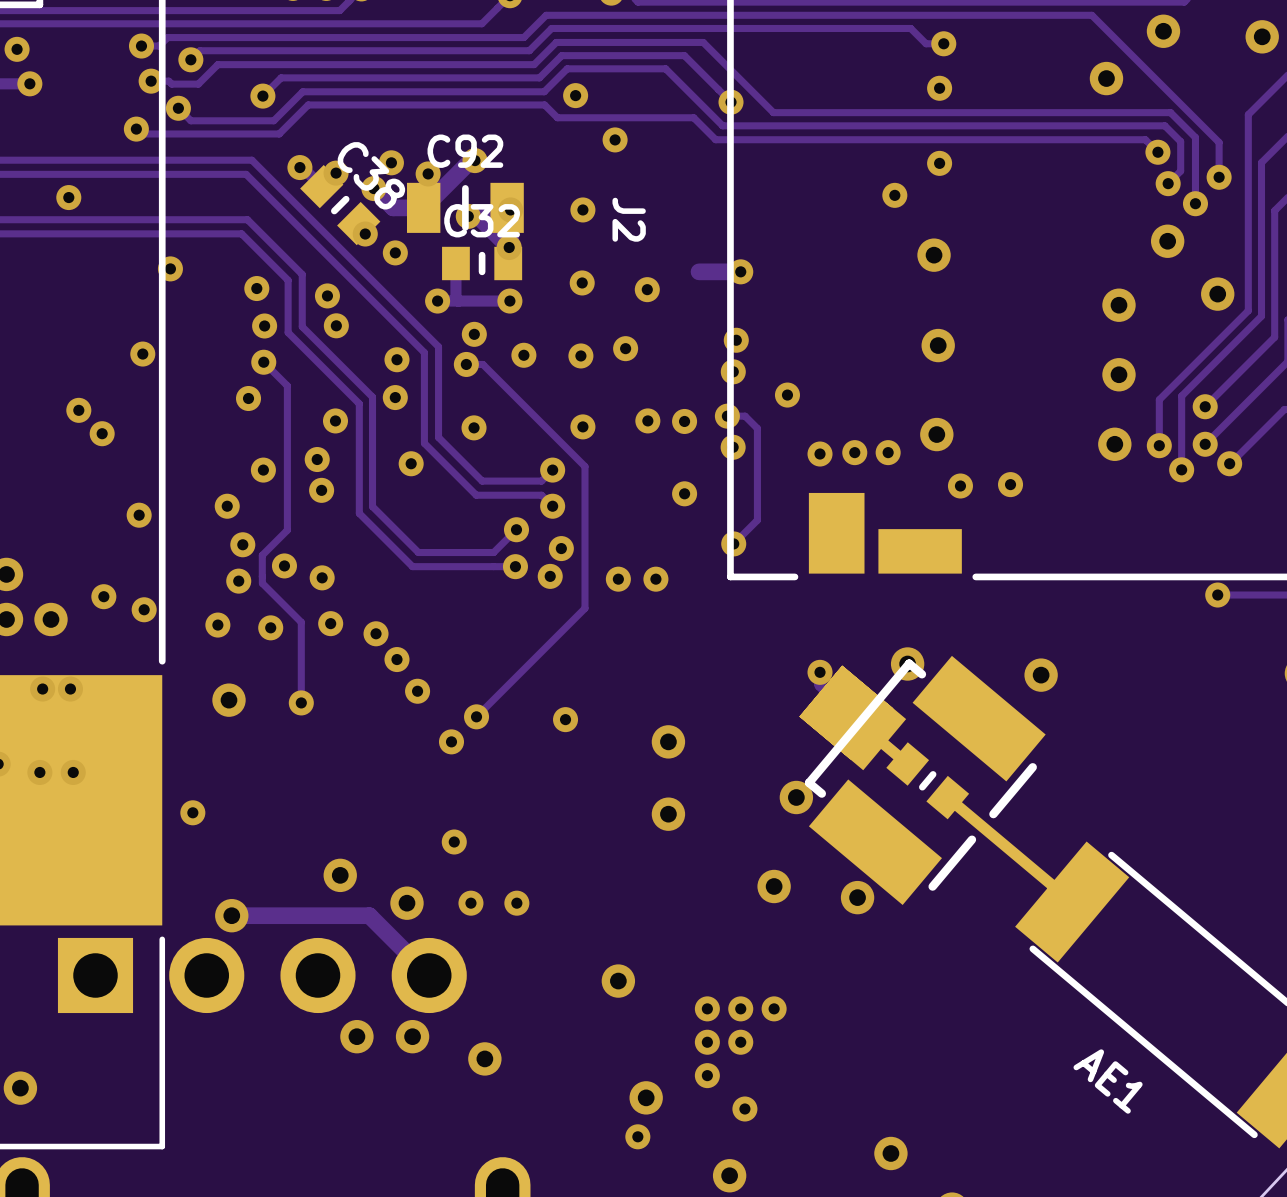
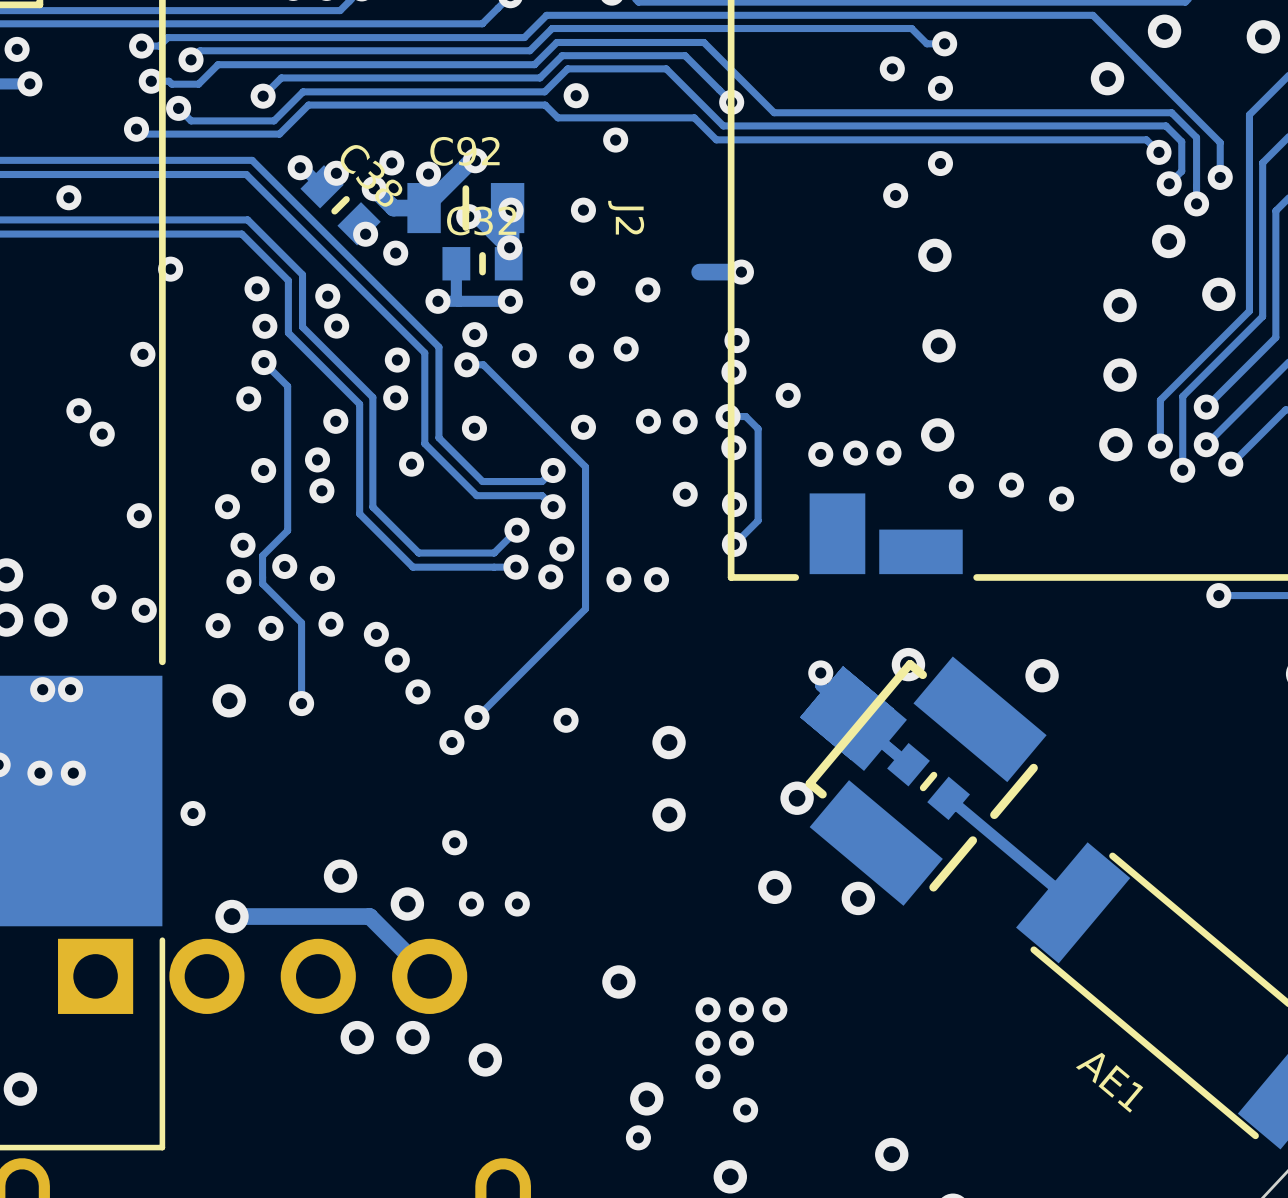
via: none -> (892, 68)
via: none -> (1061, 498)
via: none -> (734, 504)

